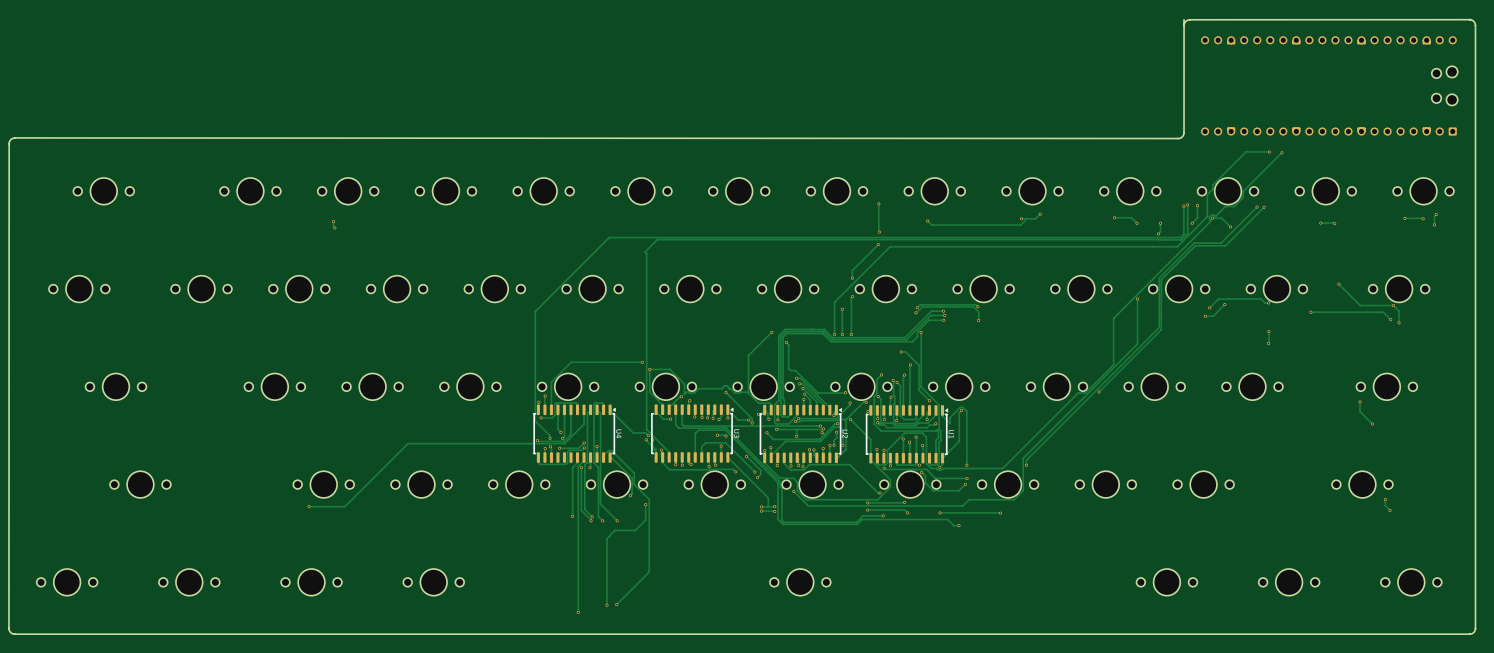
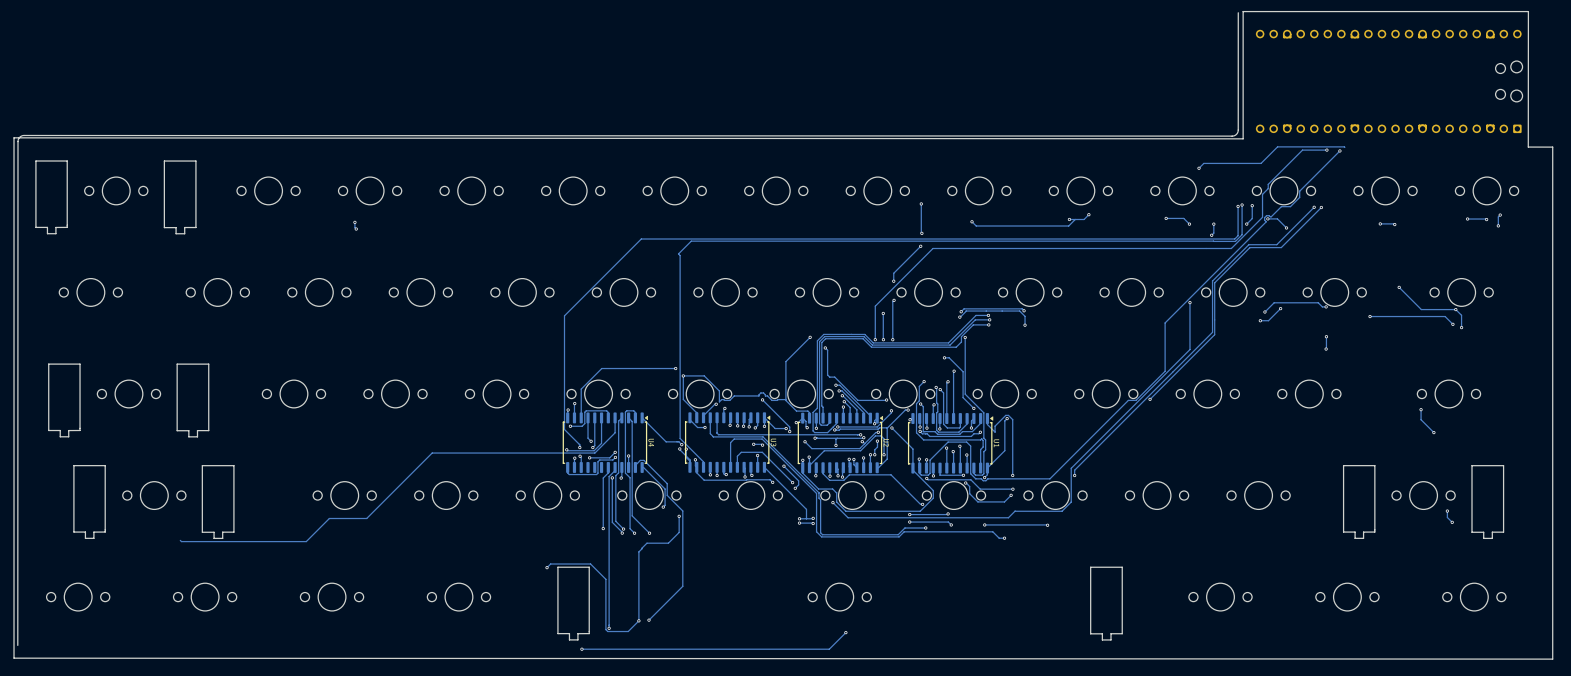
board edge: none -> (1528, 11) (1243, 11) (1243, 138) (14, 137) (14, 658) (1552, 659) (1552, 147) (1528, 147) (1528, 11)
board edge: (1469, 19) (1473, 21) (1475, 25) -> none
board edge: (1470, 19) (1189, 19) (1185, 21) (1184, 25) -> none
board edge: (1475, 25) (1475, 628) -> none
track: none -> (1344, 147) (1277, 146) (1261, 163) (1203, 163) (1199, 168)
drawing: none -> [35, 160, 197, 234]
via: none -> (1199, 168)
drawing: none -> [48, 363, 209, 437]
drawing: none -> [73, 465, 235, 539]
drawing: none -> [1343, 465, 1504, 539]
track: none -> (329, 518) (306, 541) (180, 540)
via: (308, 506) -> none
drawing: none -> [557, 567, 1123, 641]
track: none -> (547, 567) (550, 564) (590, 564) (605, 579) (605, 629) (607, 631) (628, 631) (638, 620)
via: none -> (547, 567)
track: none -> (845, 632) (829, 649) (581, 649)
via: none -> (845, 632)
board edge: (8, 628) (10, 632) (14, 634) -> none
board edge: (1475, 628) (1473, 632) (1469, 634) -> none
via: none -> (581, 649)
board edge: (1470, 634) (14, 634) -> none

